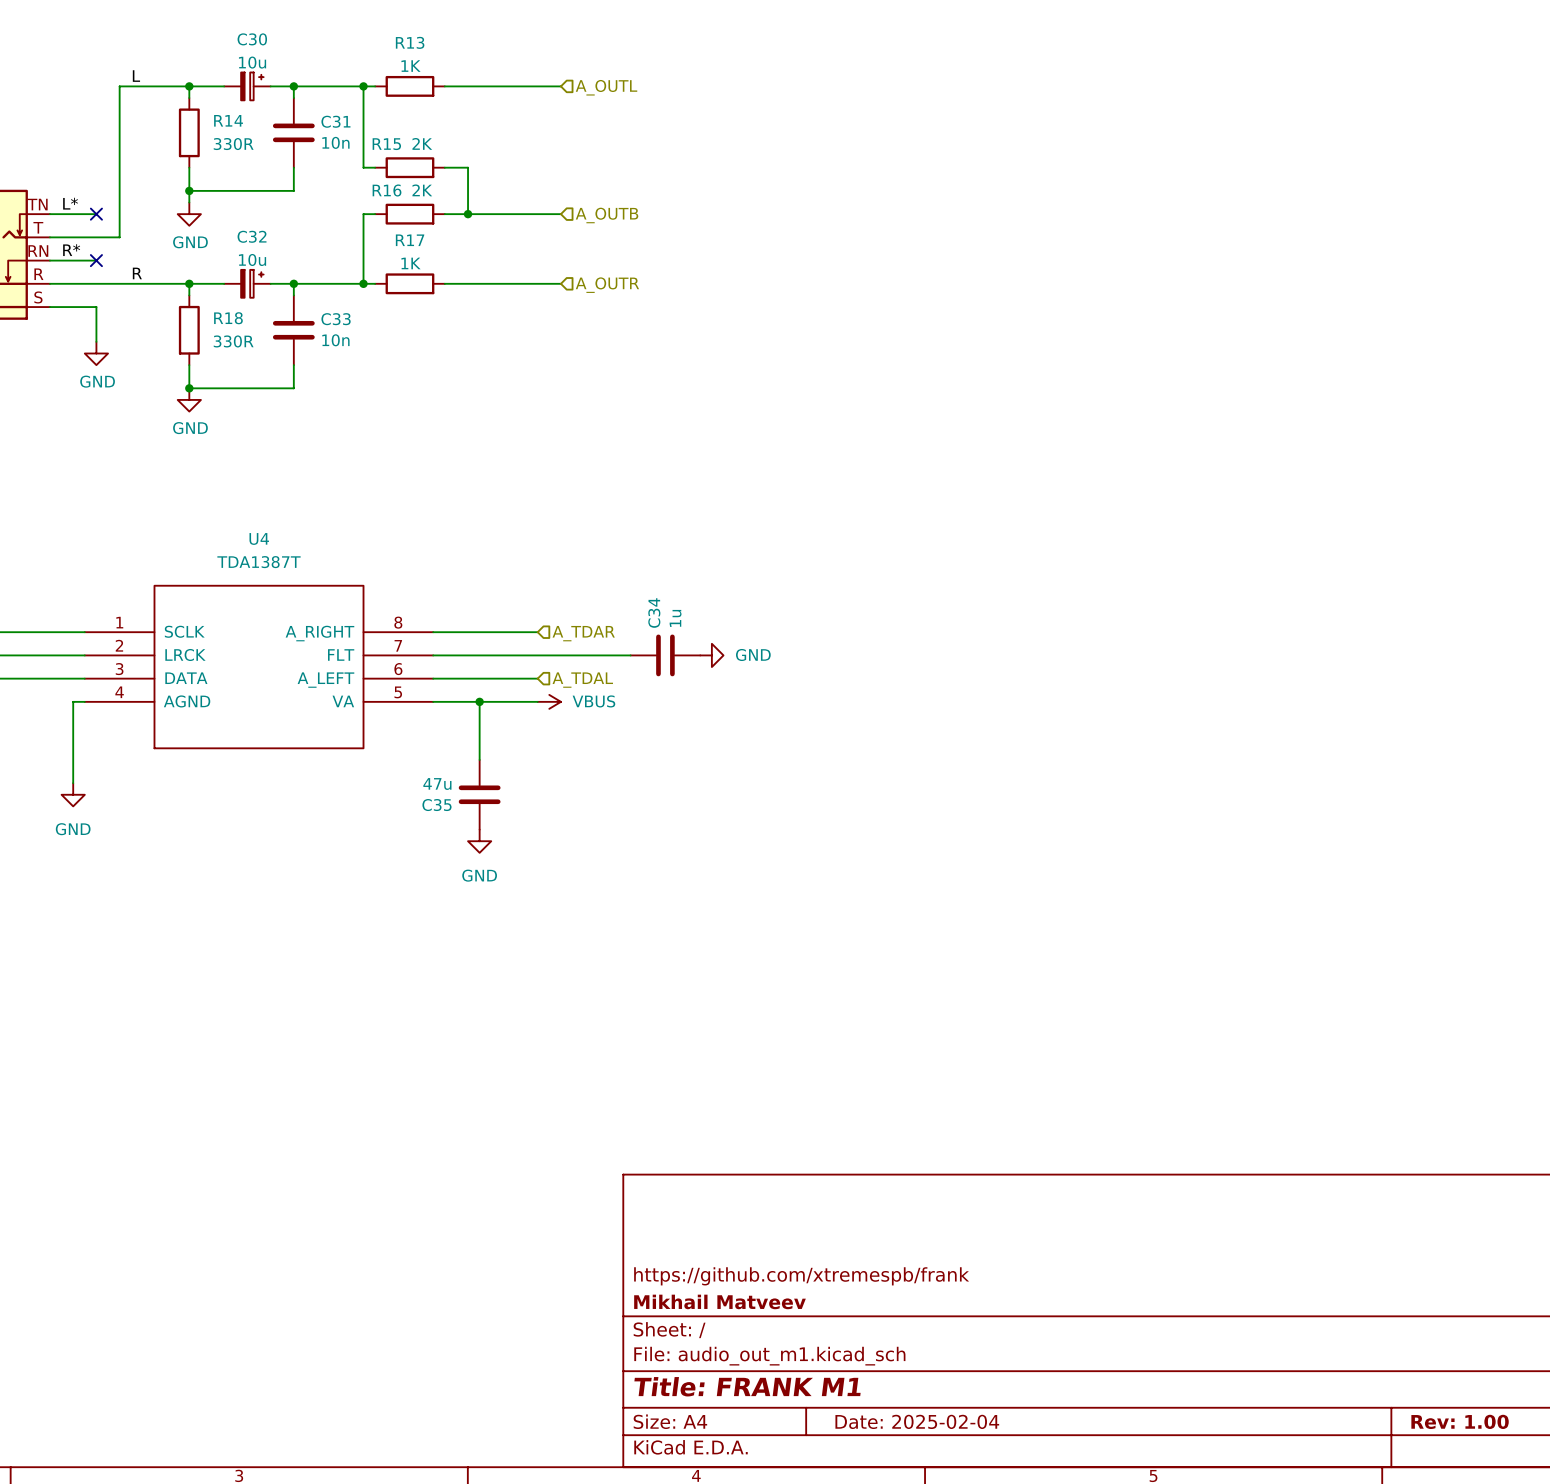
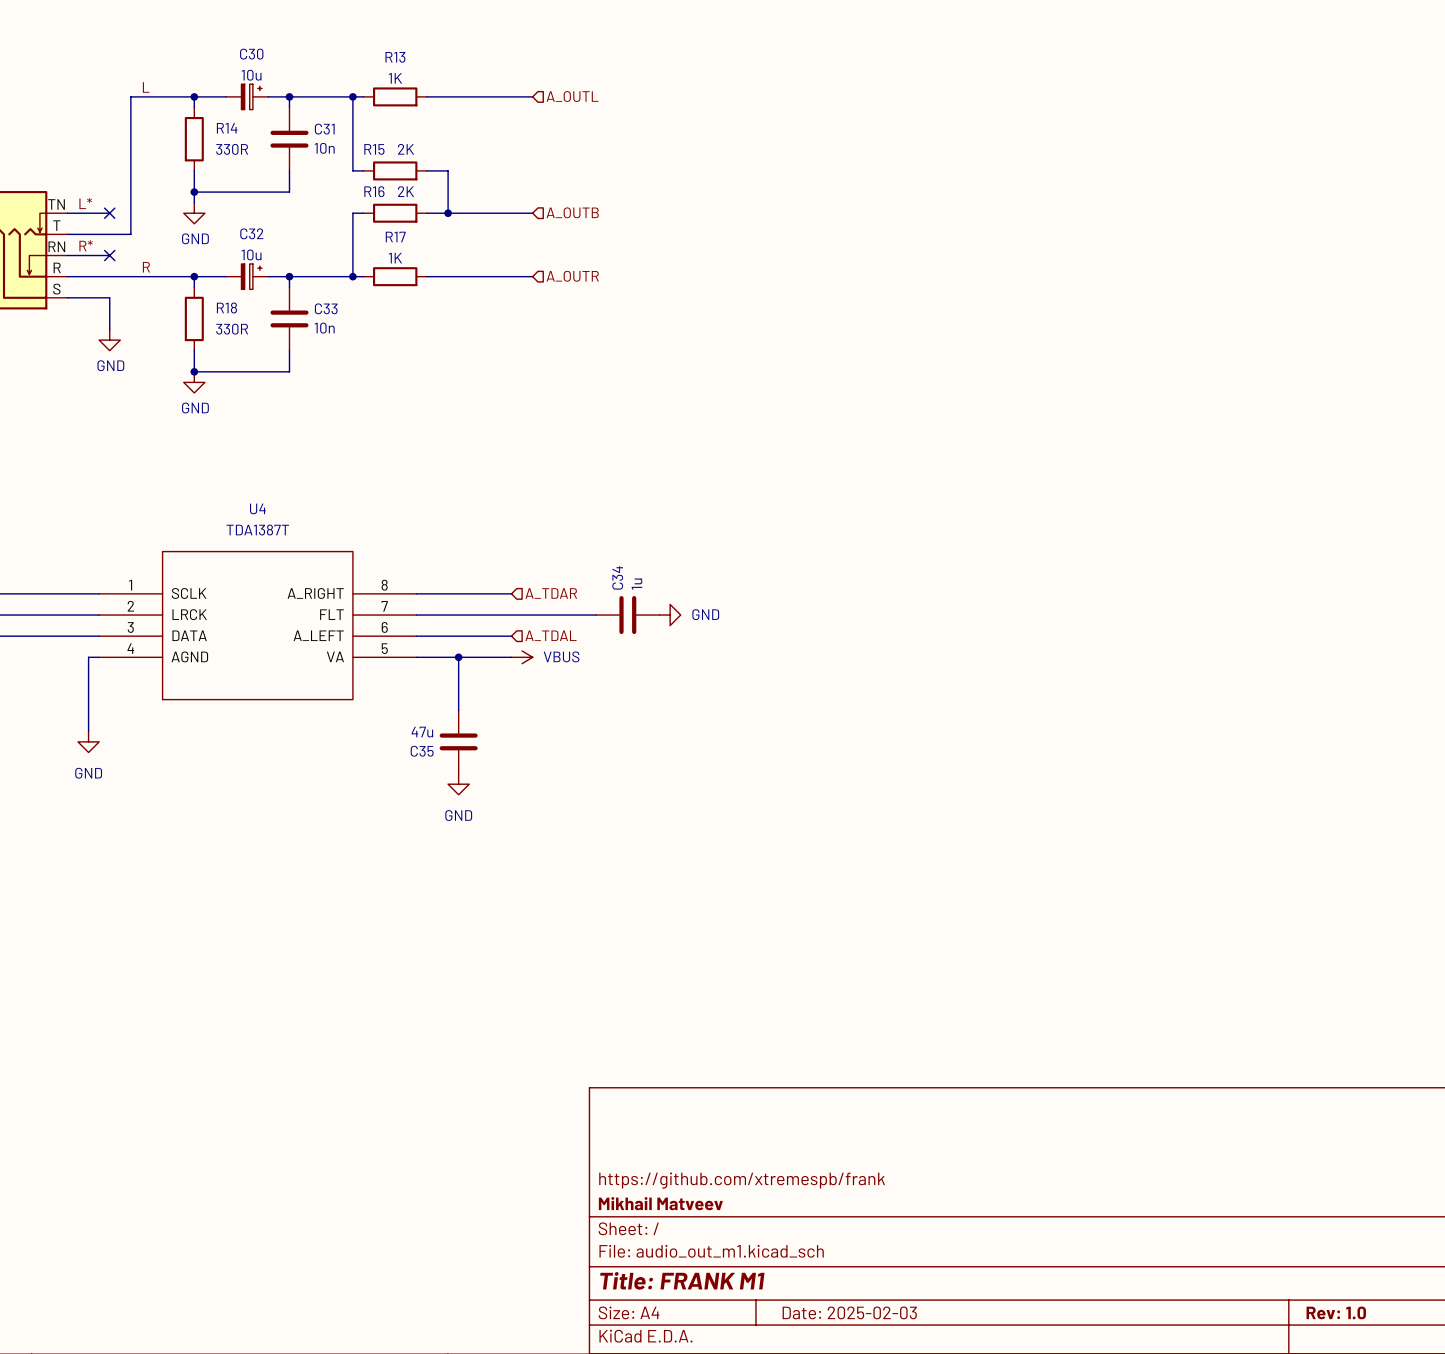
title block: Date: 2025-02-04 (917, 1421) -> Date: 2025-02-03 (849, 1312)
title block: Rev: 1.00 (1460, 1421) -> Rev: 1.0 (1336, 1312)

